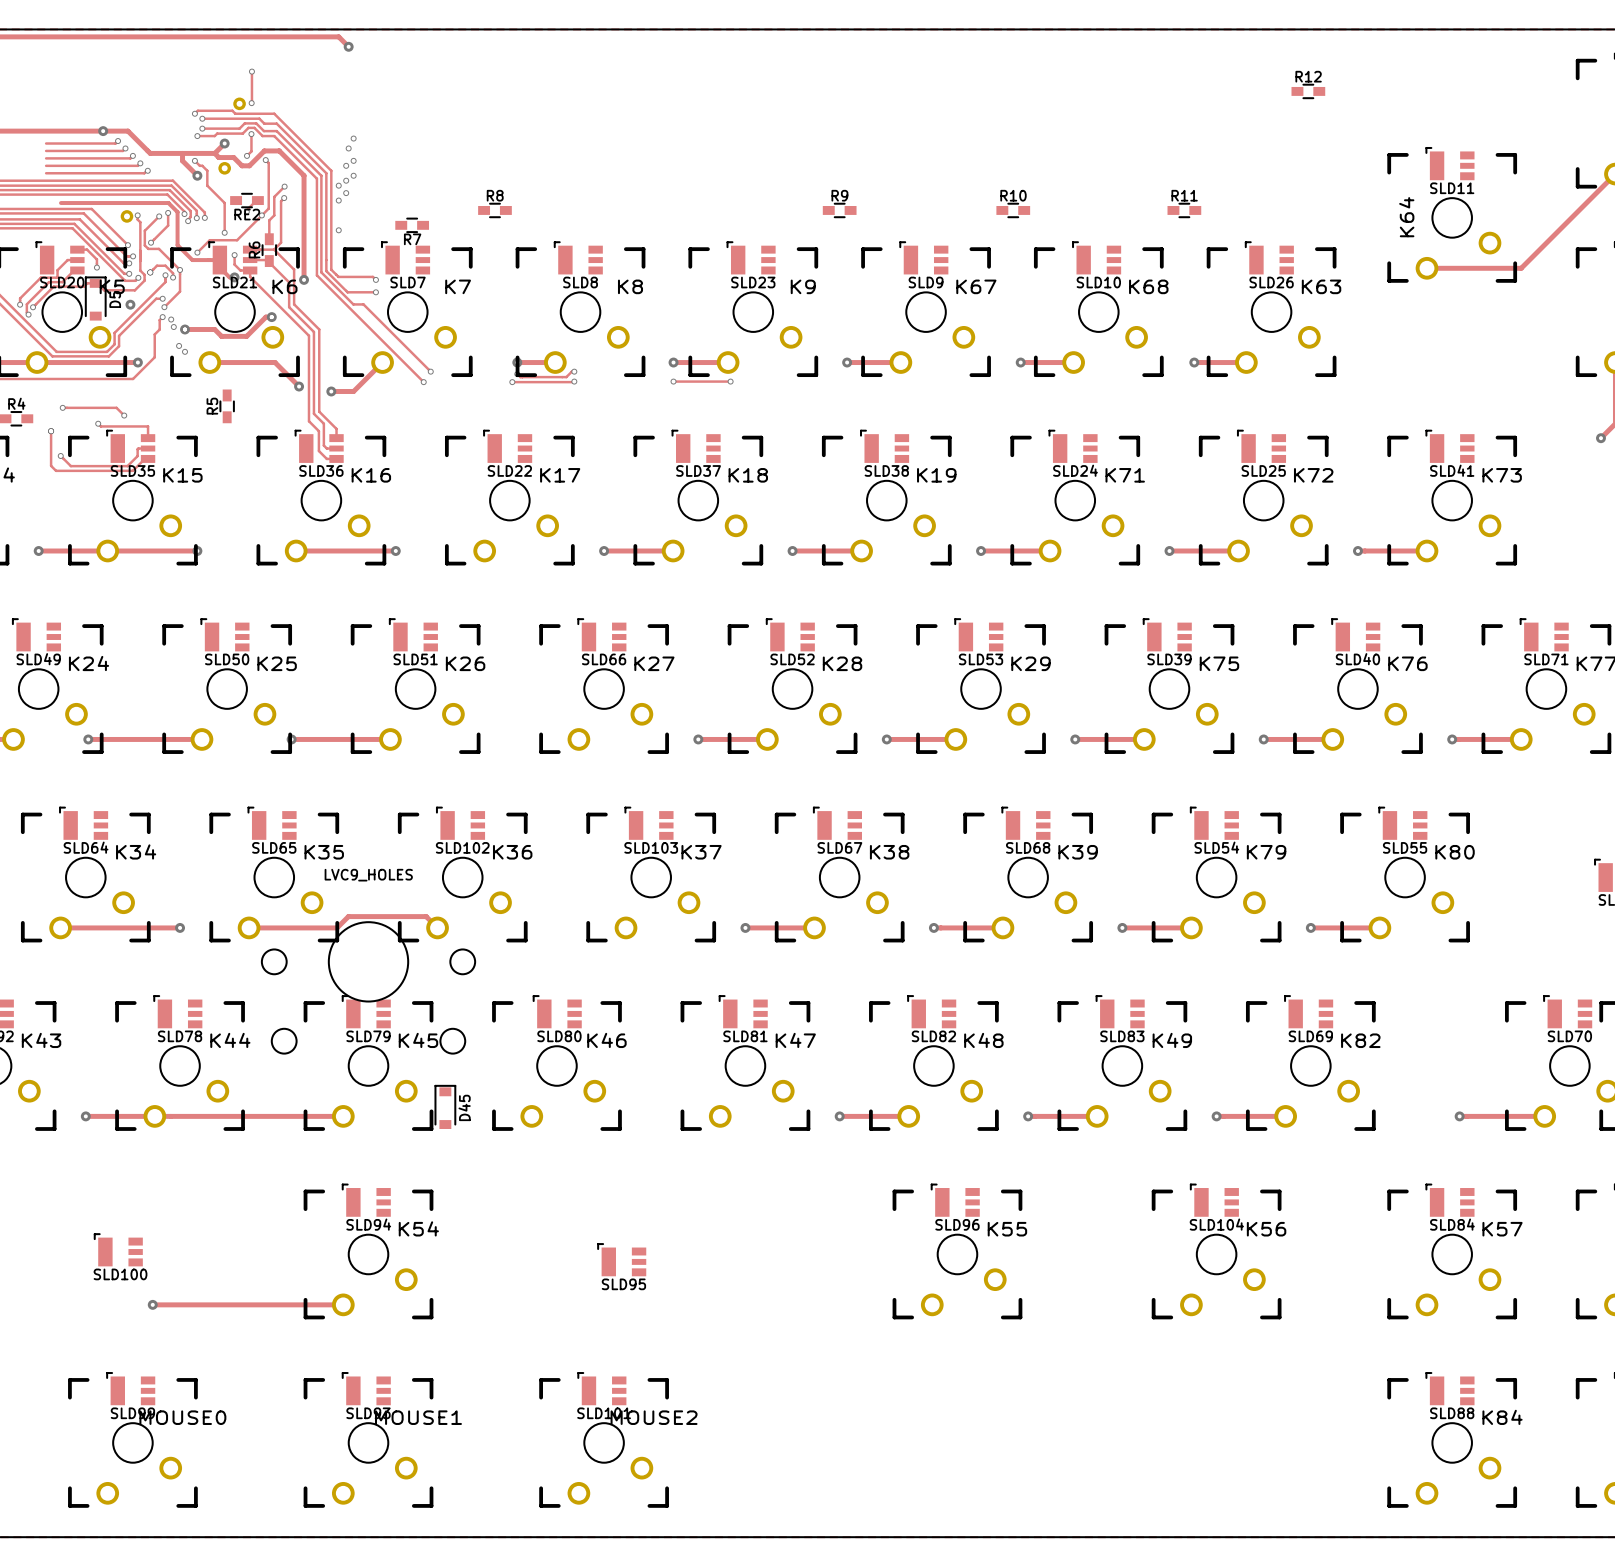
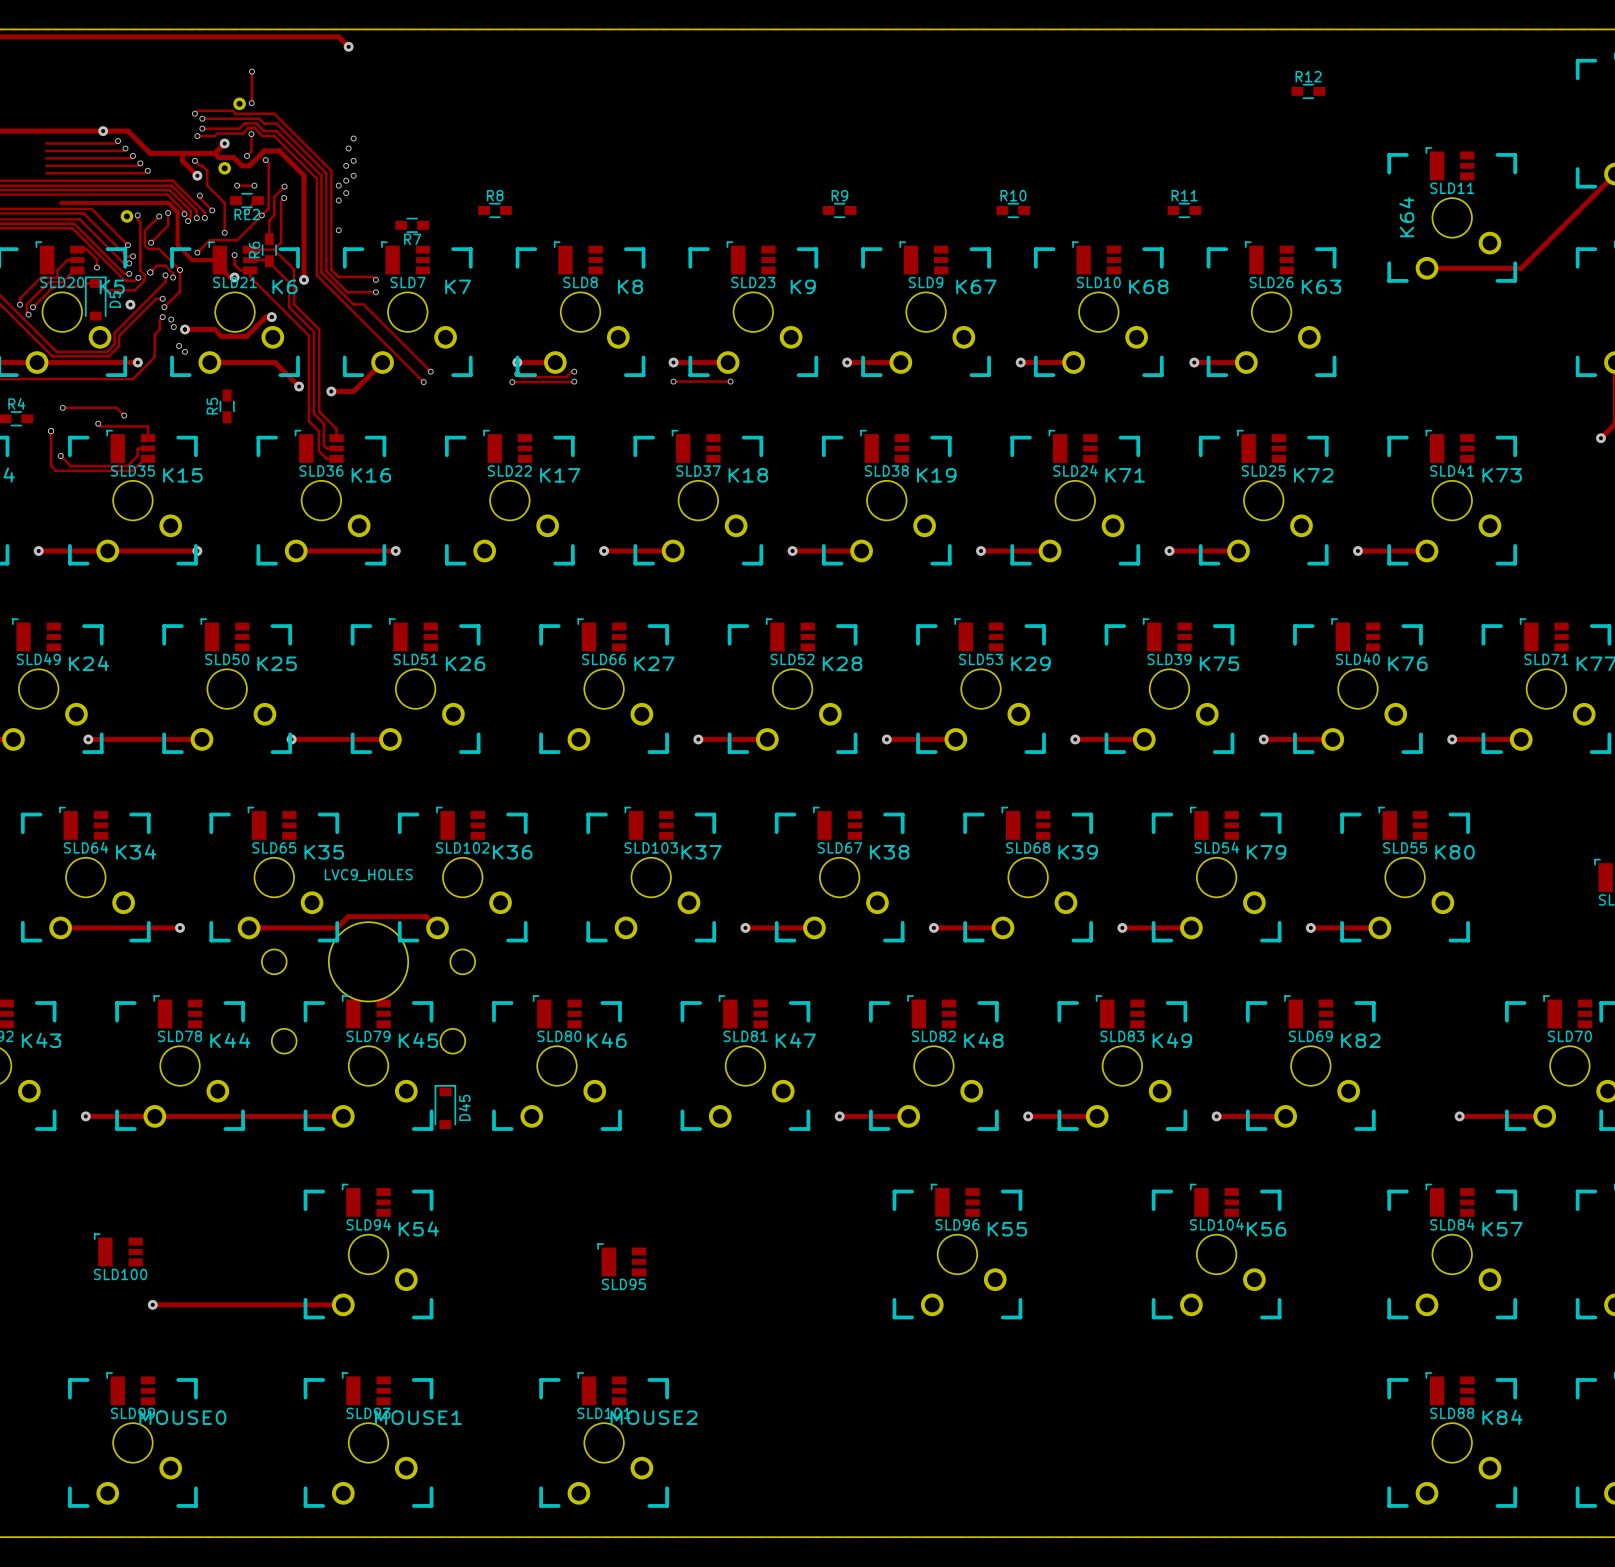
track: none -> (237, 185) (254, 185)
via: none -> (237, 185)
via: none -> (254, 185)
track: none -> (199, 195) (199, 198) (212, 210)
via: none -> (199, 195)
via: none -> (212, 210)

